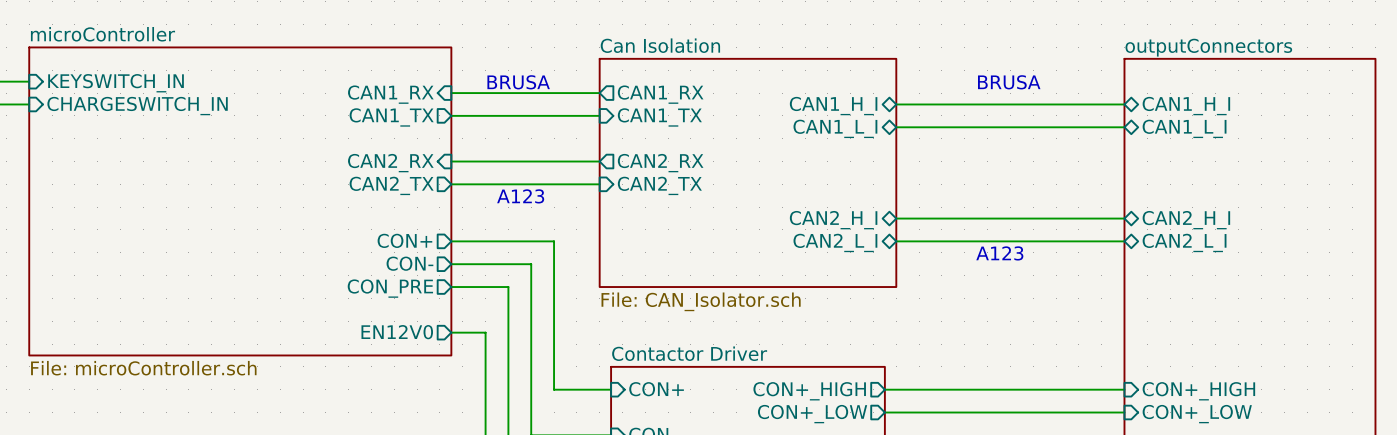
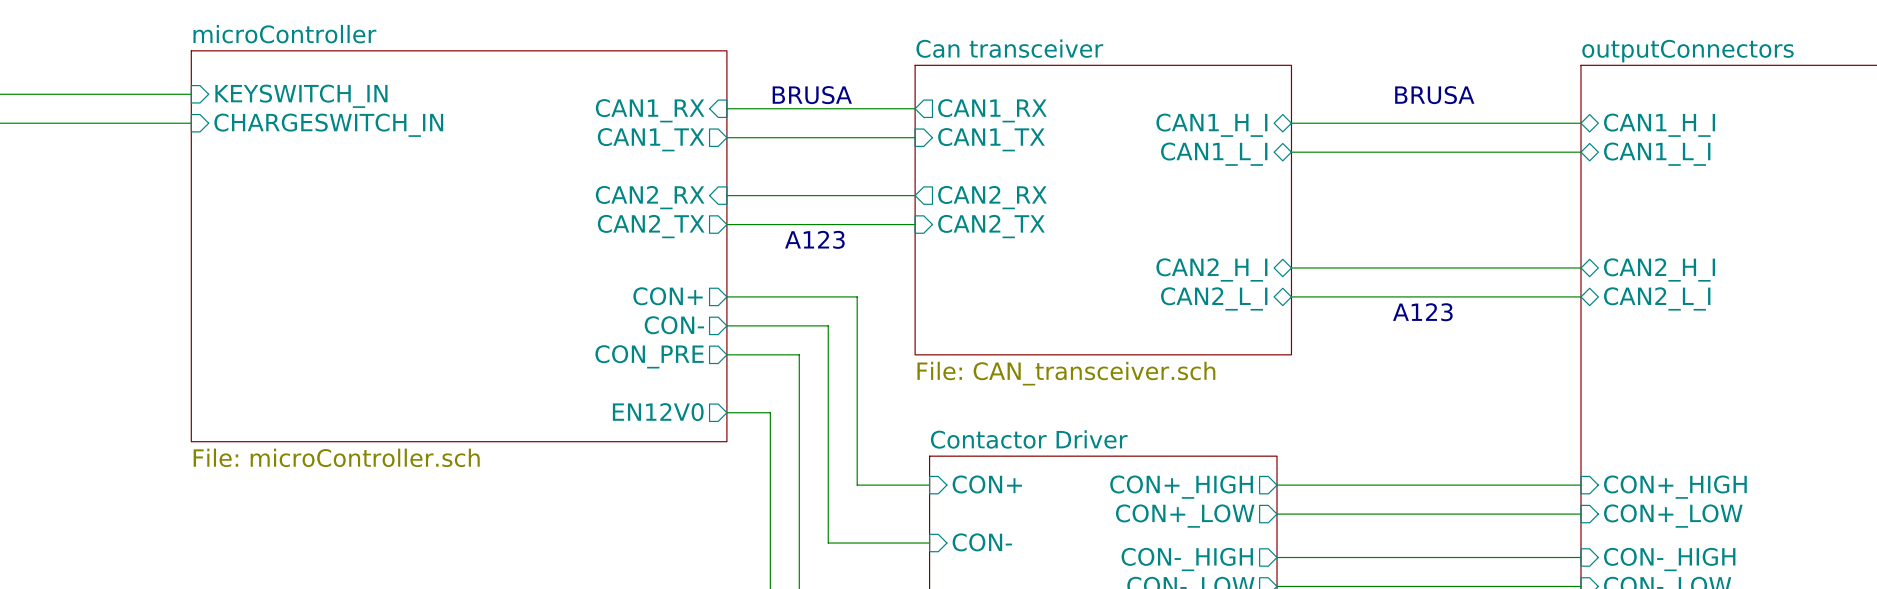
sheet Can Isolation name: Can Isolation (660, 45) -> Can transceiver (1009, 48)
sheet Can Isolation value: File: CAN_Isolator.sch (701, 301) -> File: CAN_transceiver.sch (1066, 373)

